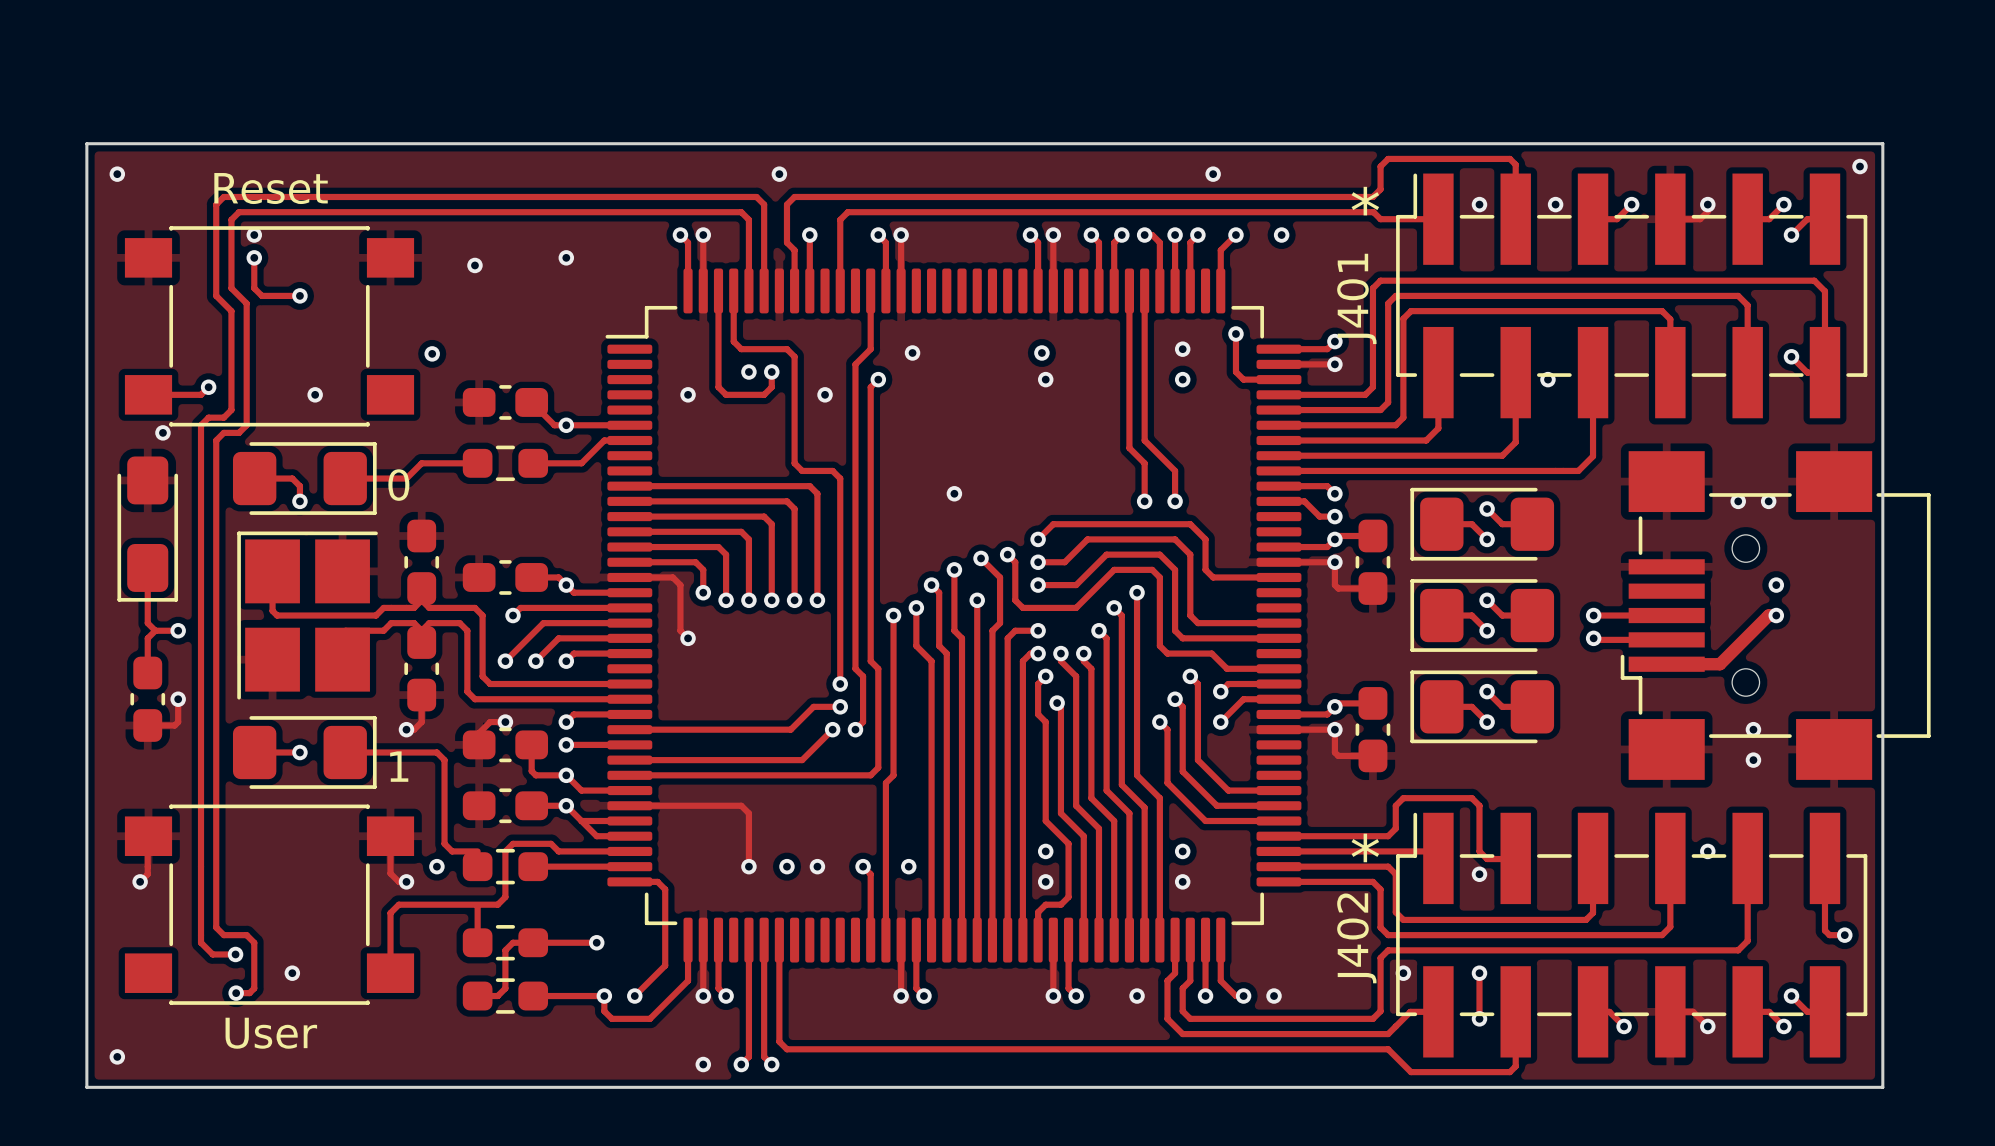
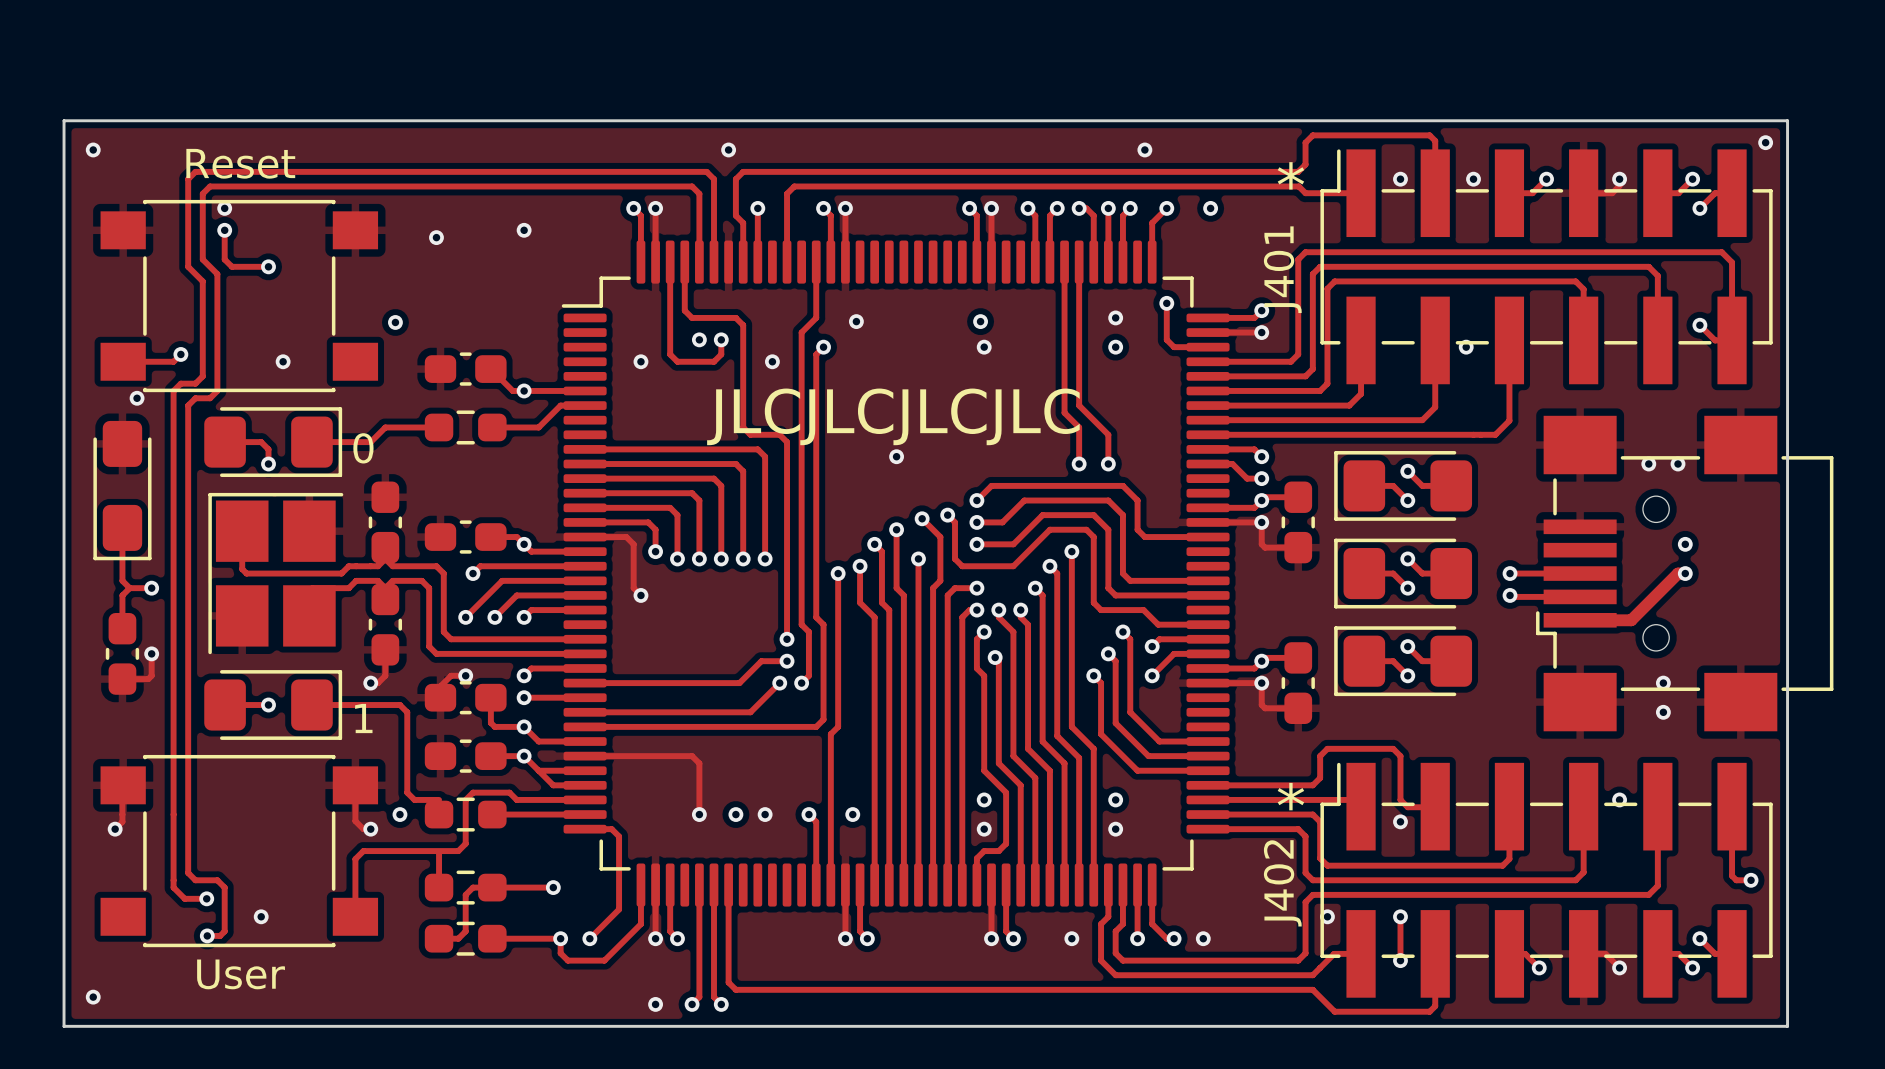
text: none -> JLCJLCJLCJLC (893, 416)

